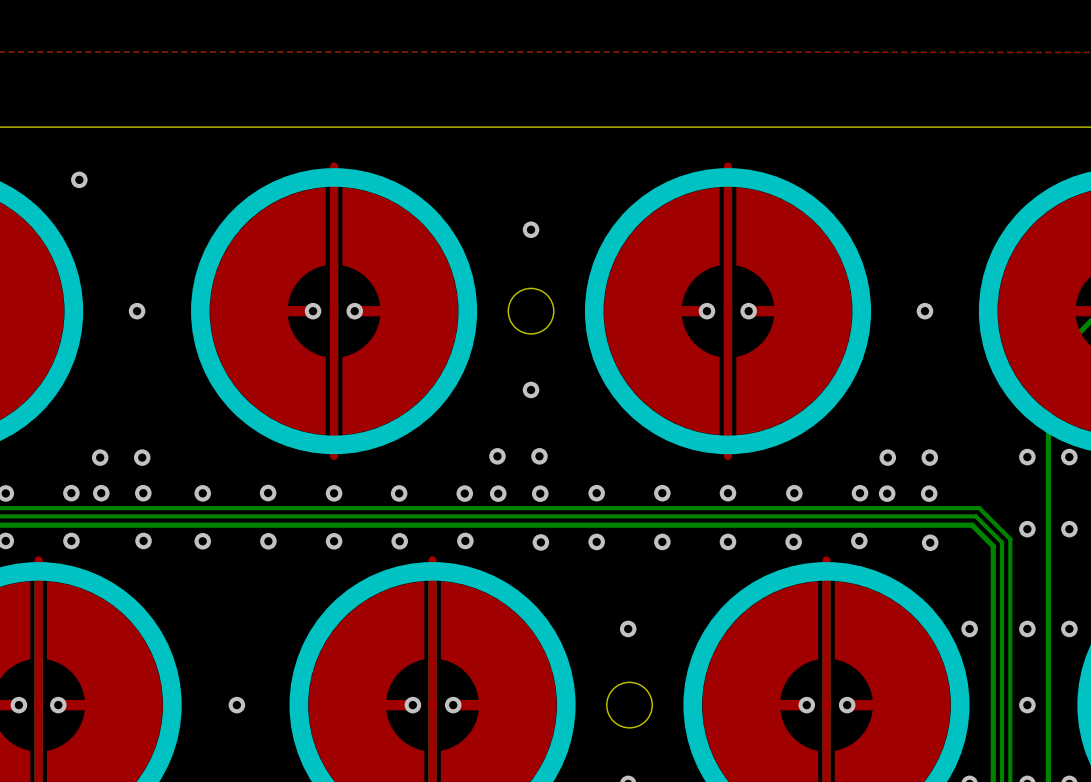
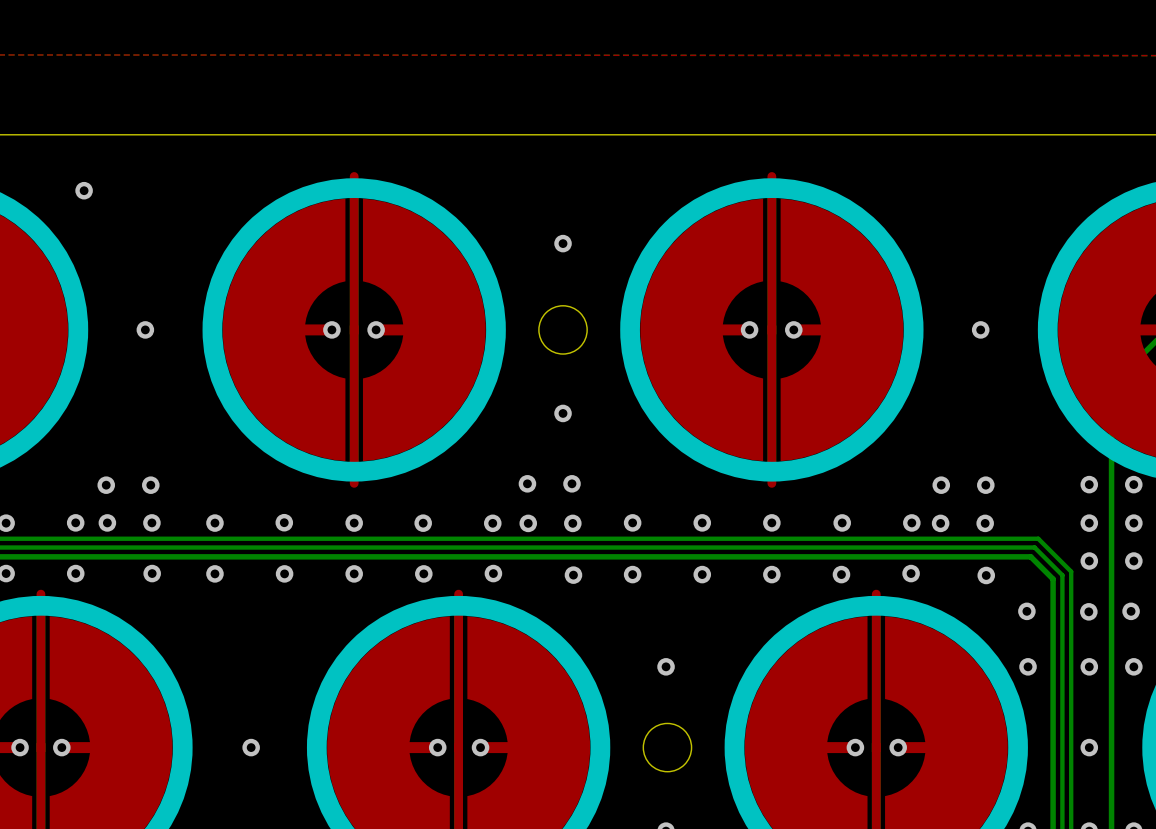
via: none -> (1089, 523)
via: none -> (1133, 523)
via: none -> (1026, 611)
via: none -> (1131, 611)
via: none -> (1088, 611)

